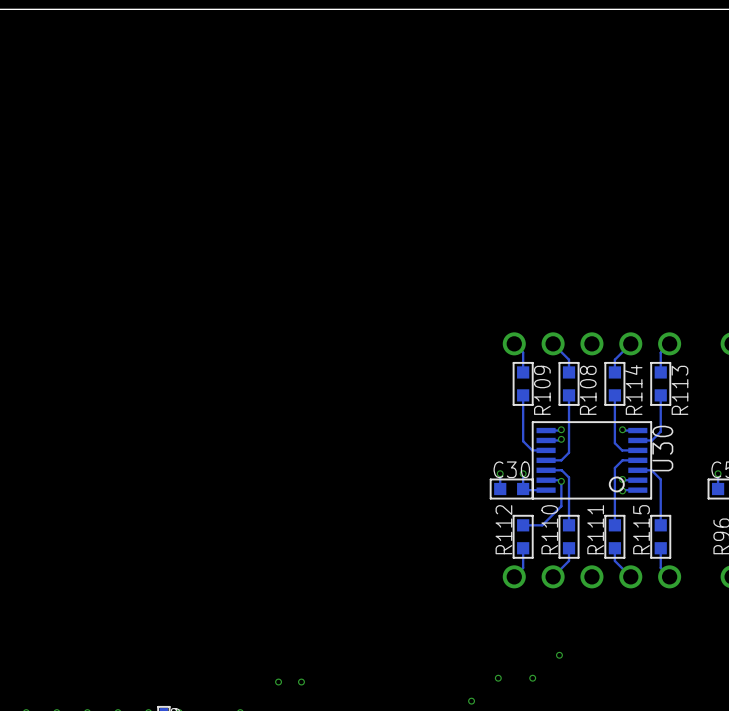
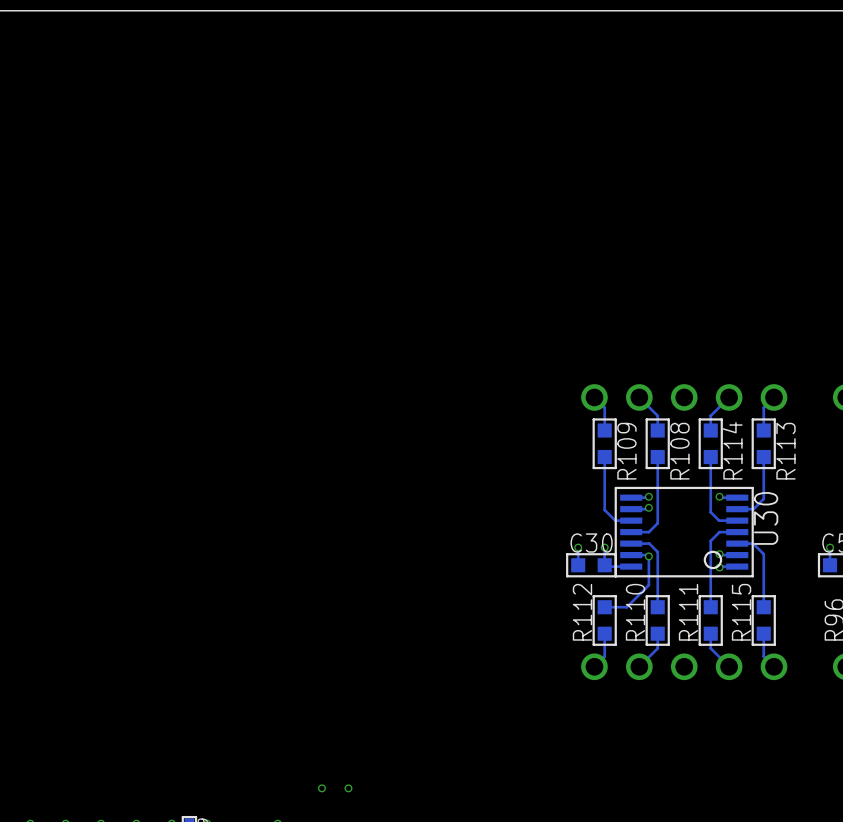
via: (559, 655) -> none
via: (498, 678) -> none
via: (532, 678) -> none
via: (471, 701) -> none

